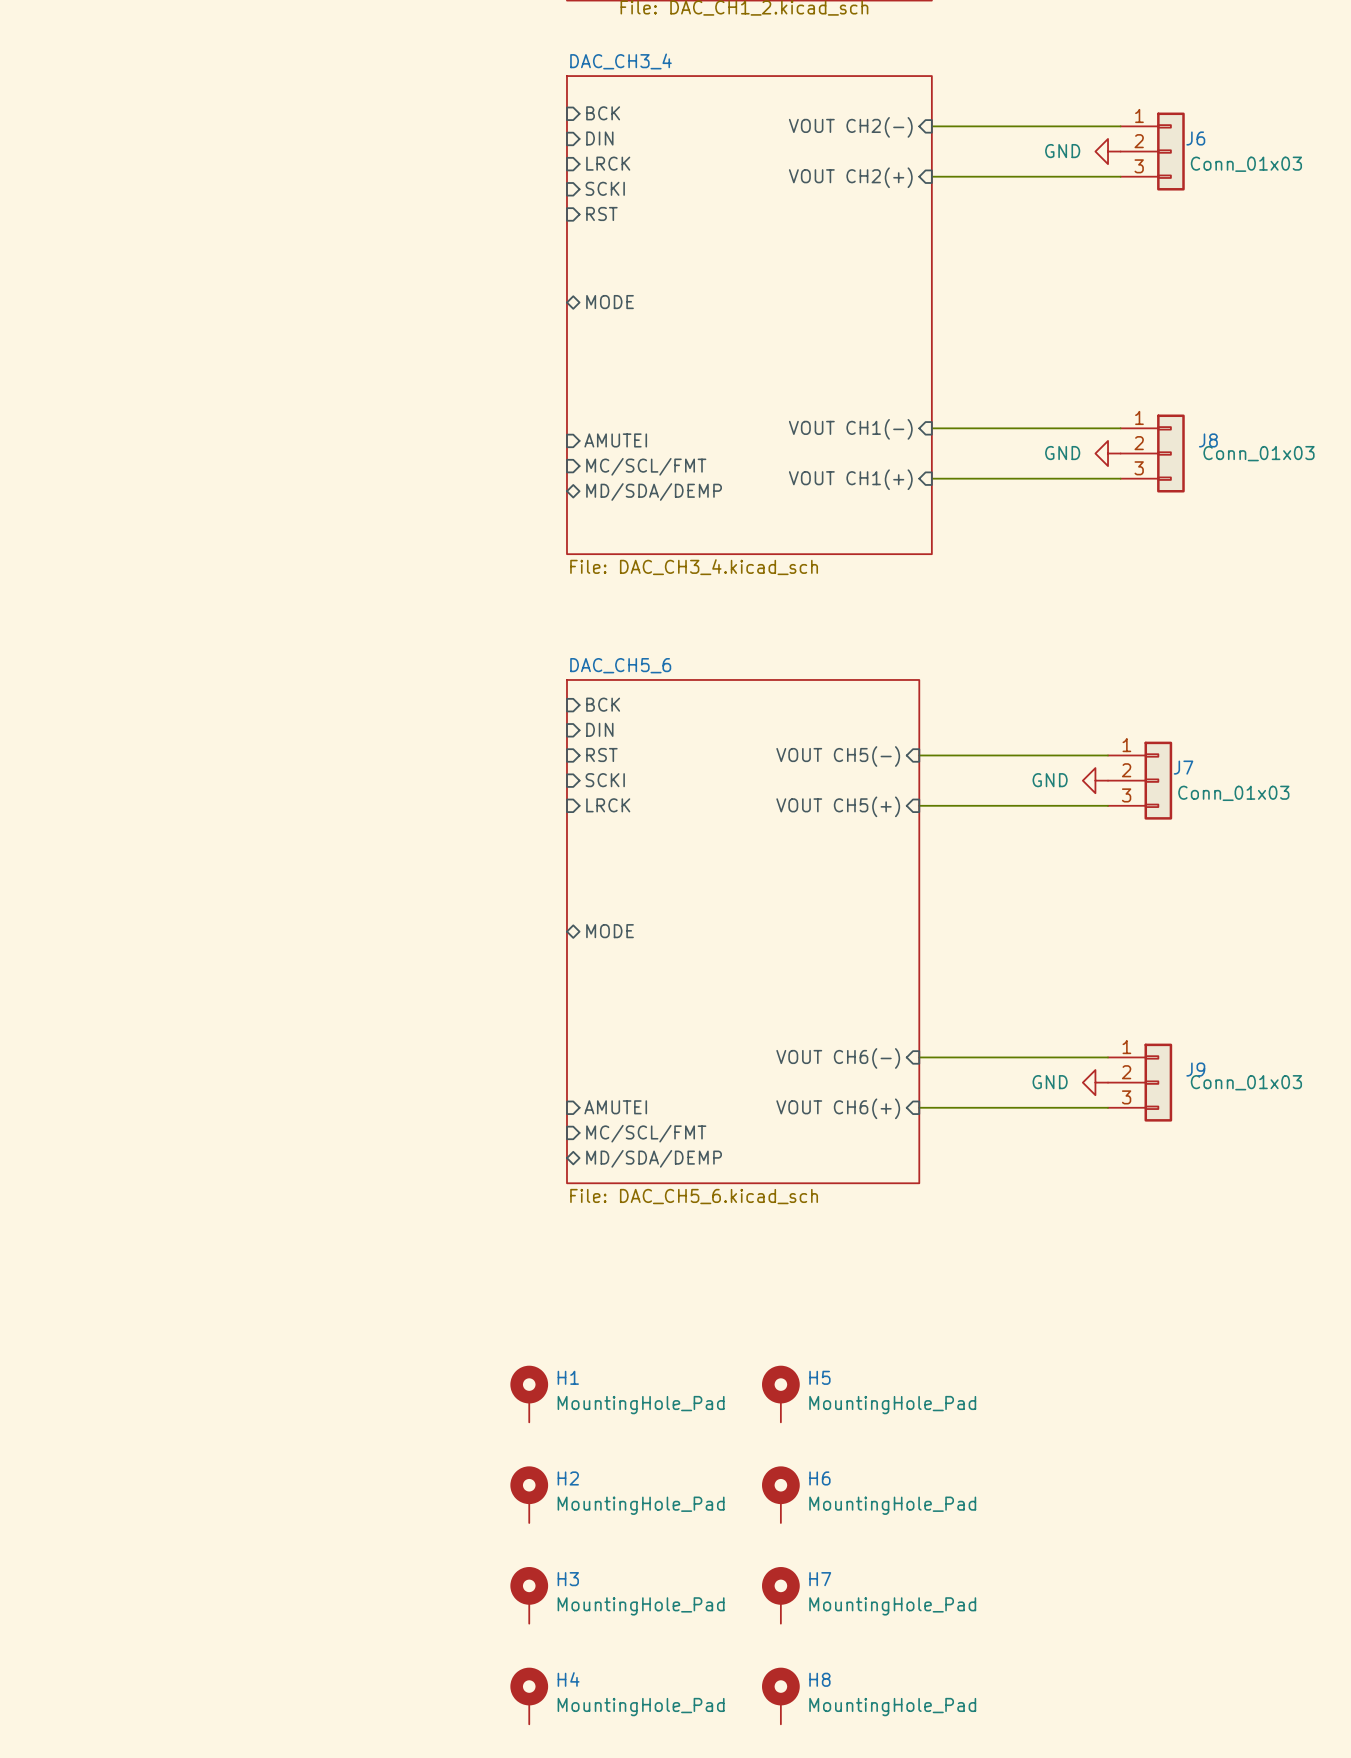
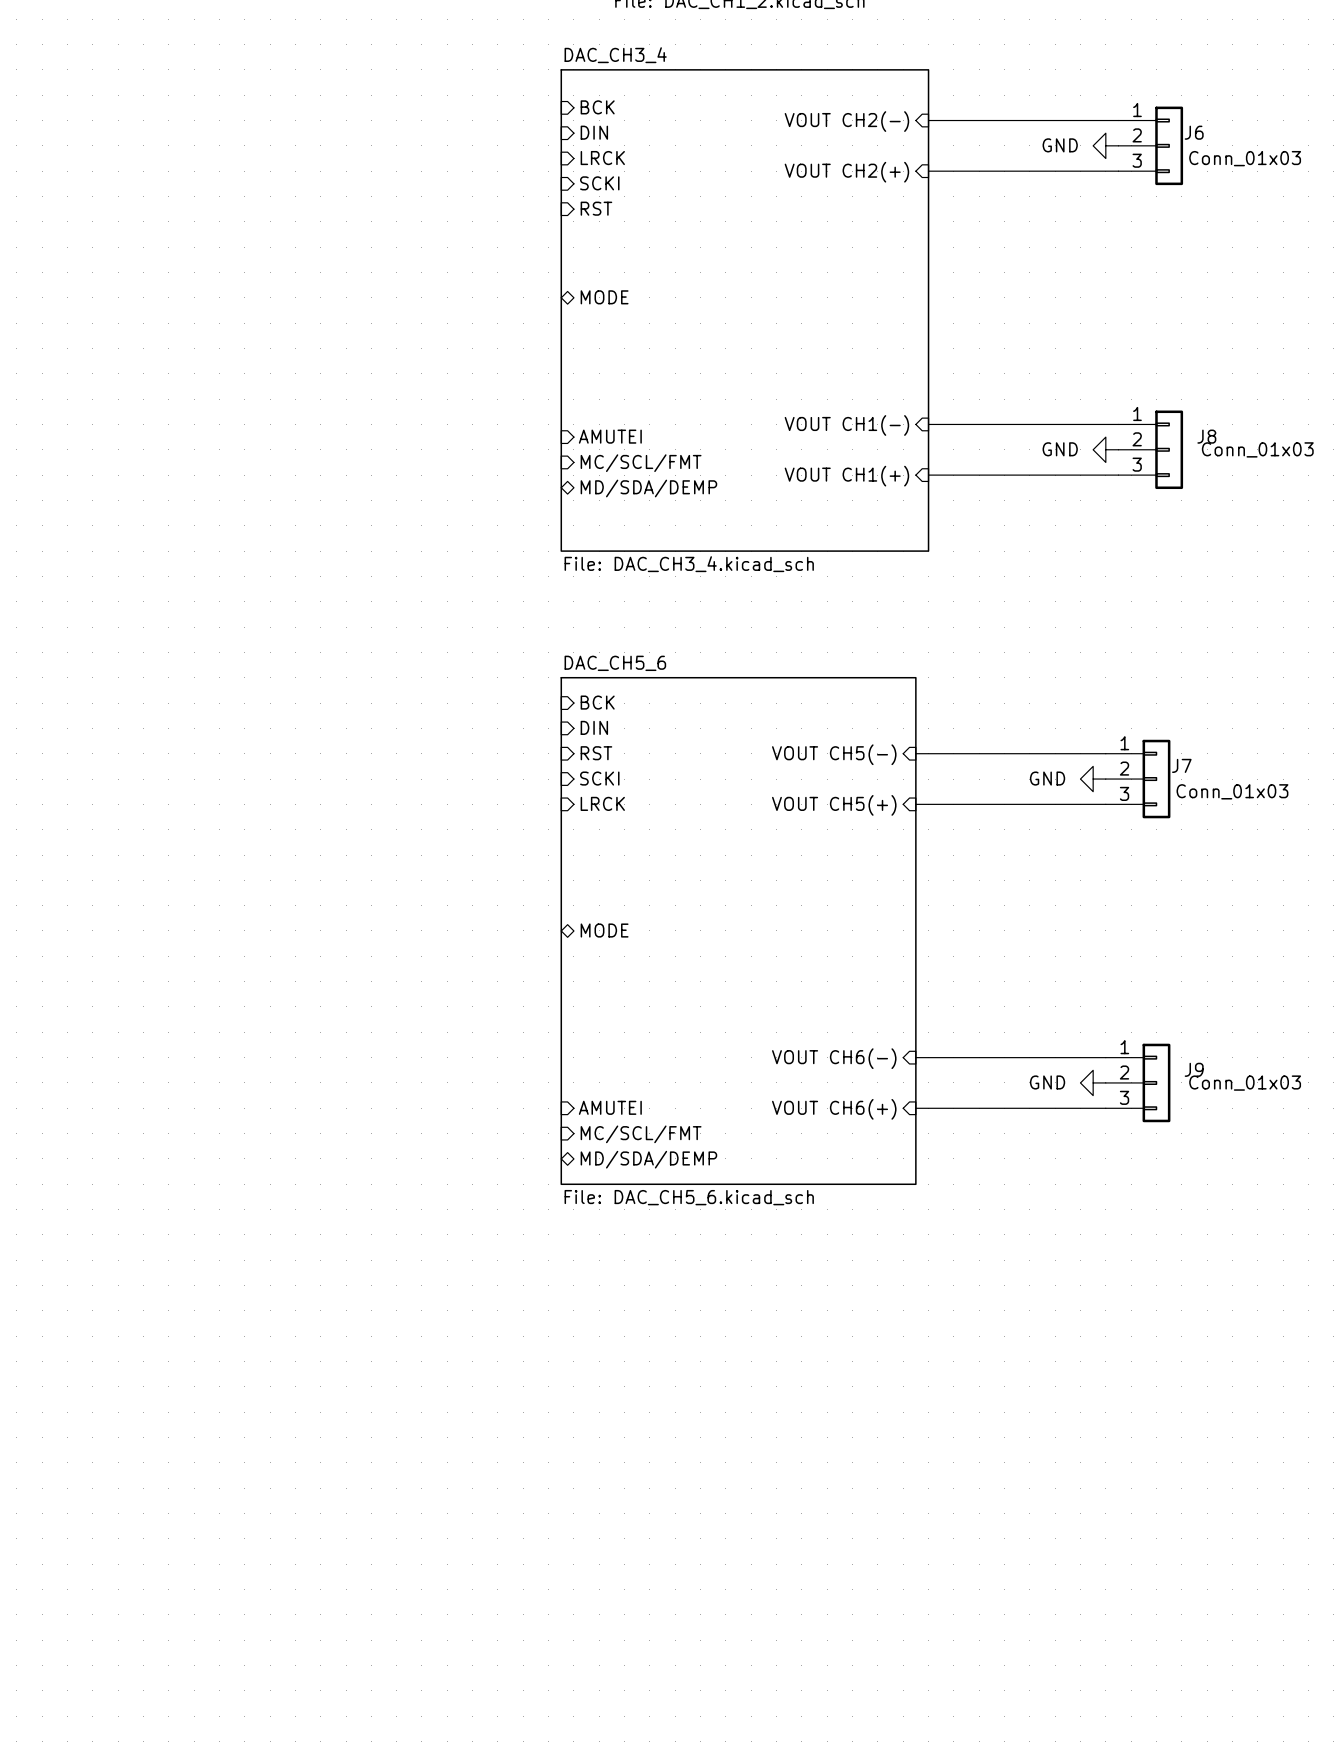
H1: MountingHole_Pad (529, 1394) -> none
H5: MountingHole_Pad (780, 1394) -> none
H2: MountingHole_Pad (529, 1494) -> none
H6: MountingHole_Pad (780, 1494) -> none
H3: MountingHole_Pad (529, 1595) -> none
H7: MountingHole_Pad (780, 1595) -> none
H4: MountingHole_Pad (529, 1695) -> none
H8: MountingHole_Pad (780, 1695) -> none

